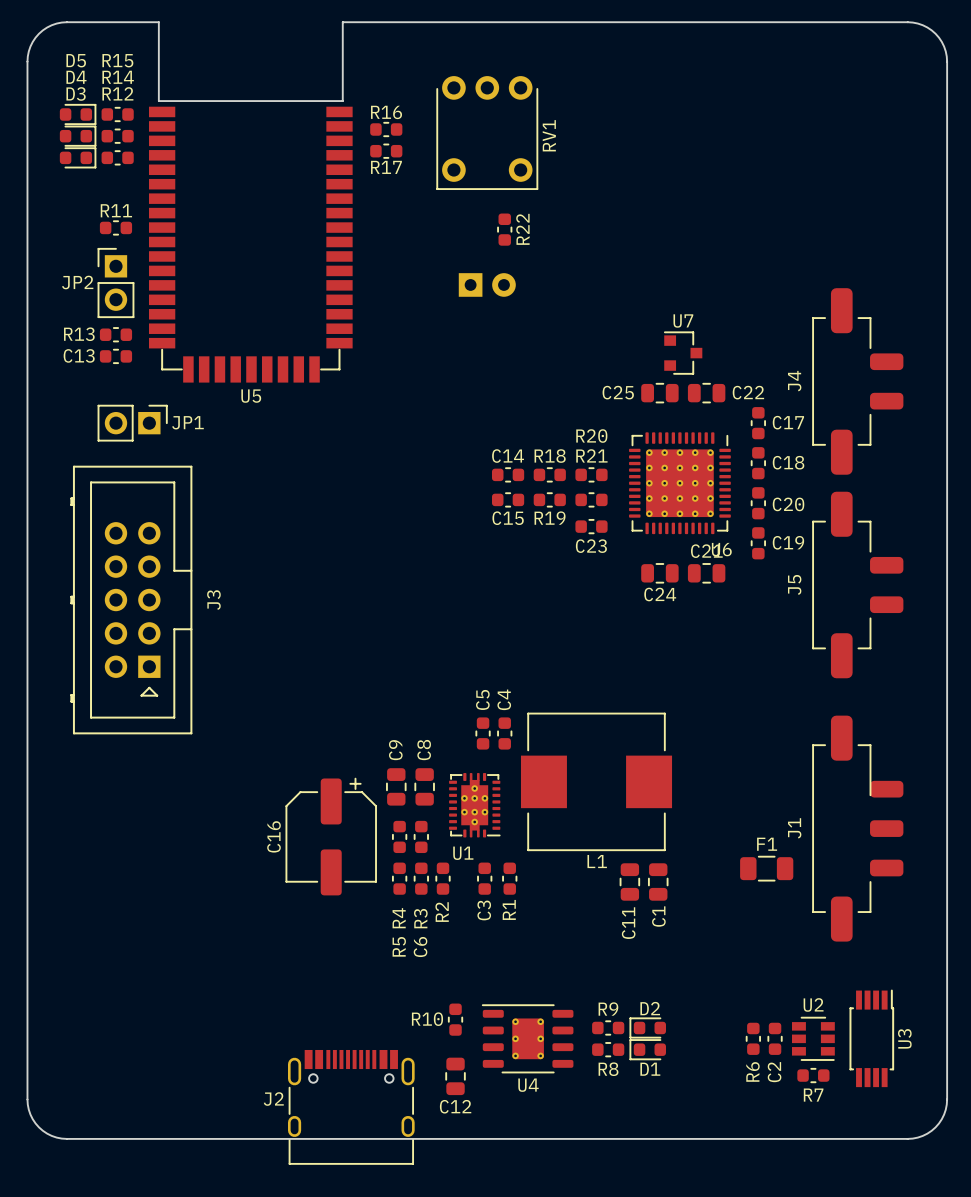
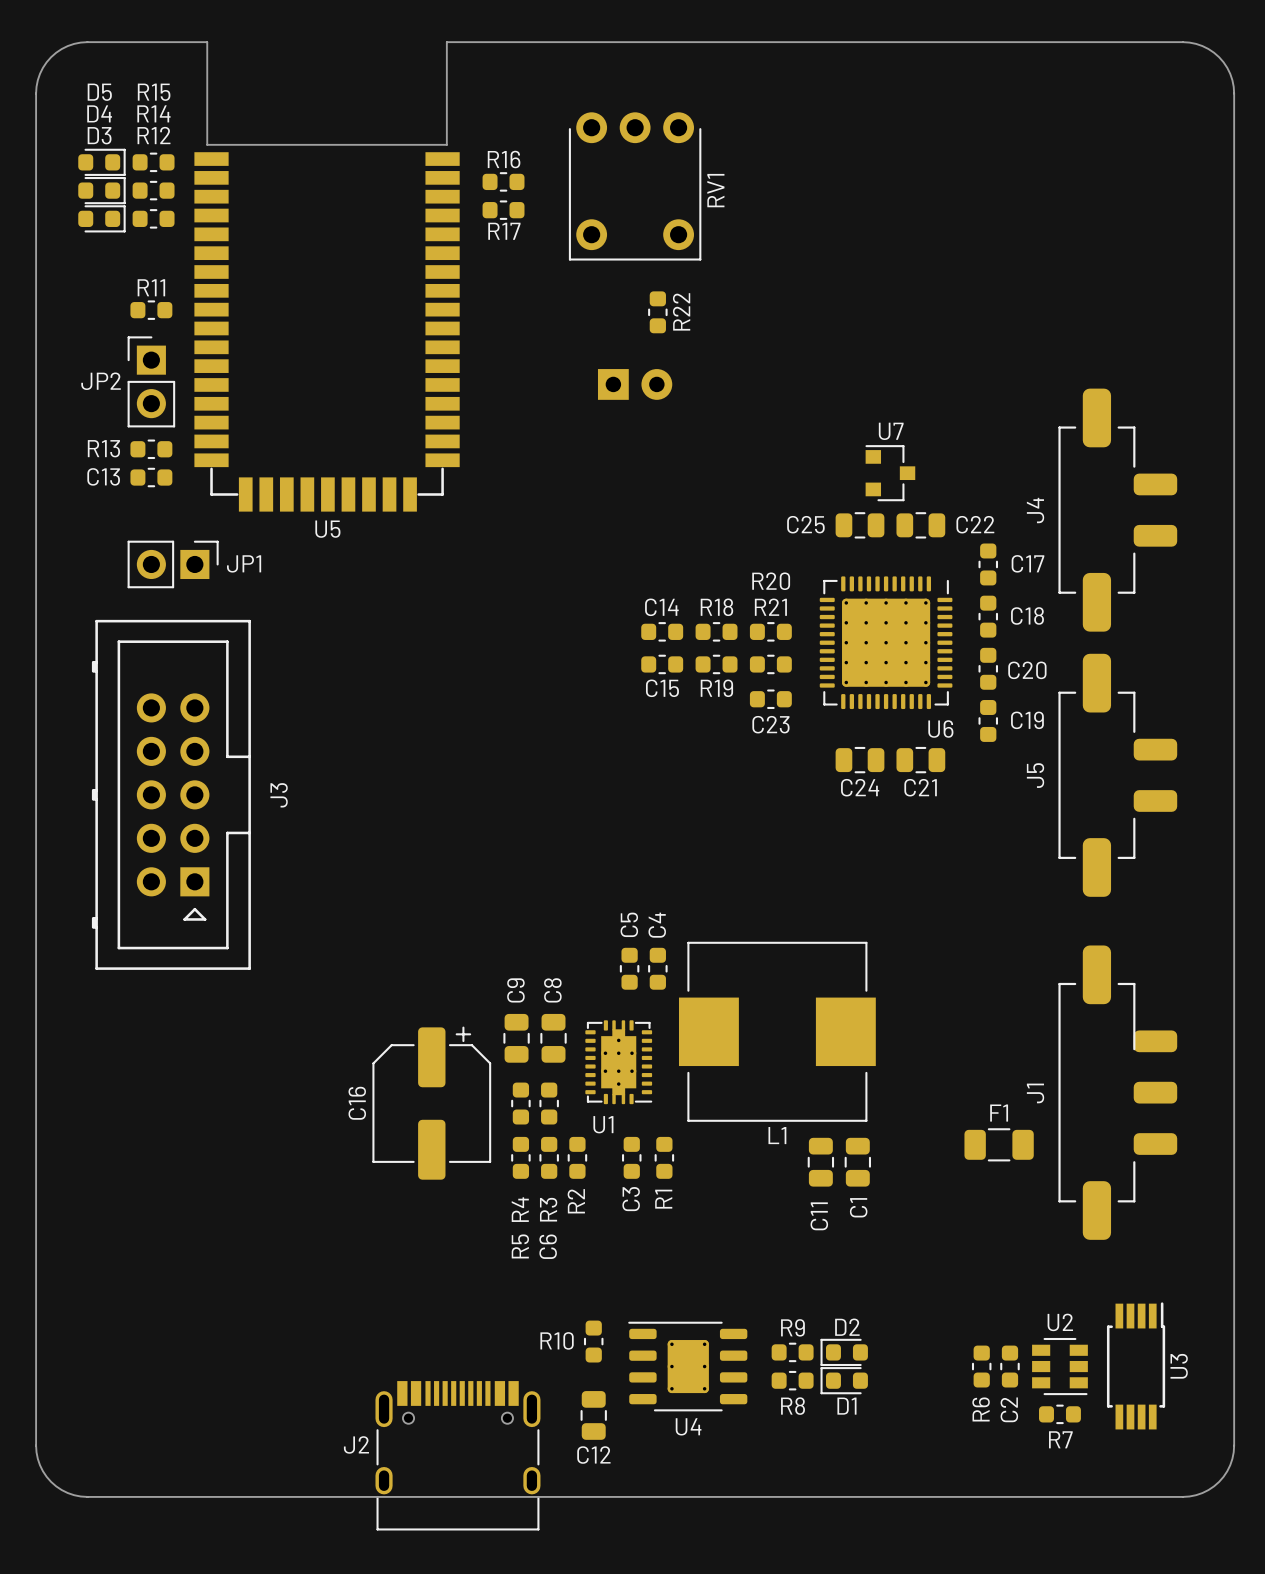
C21 name position: C21 (706, 551) -> C21 (920, 787)

